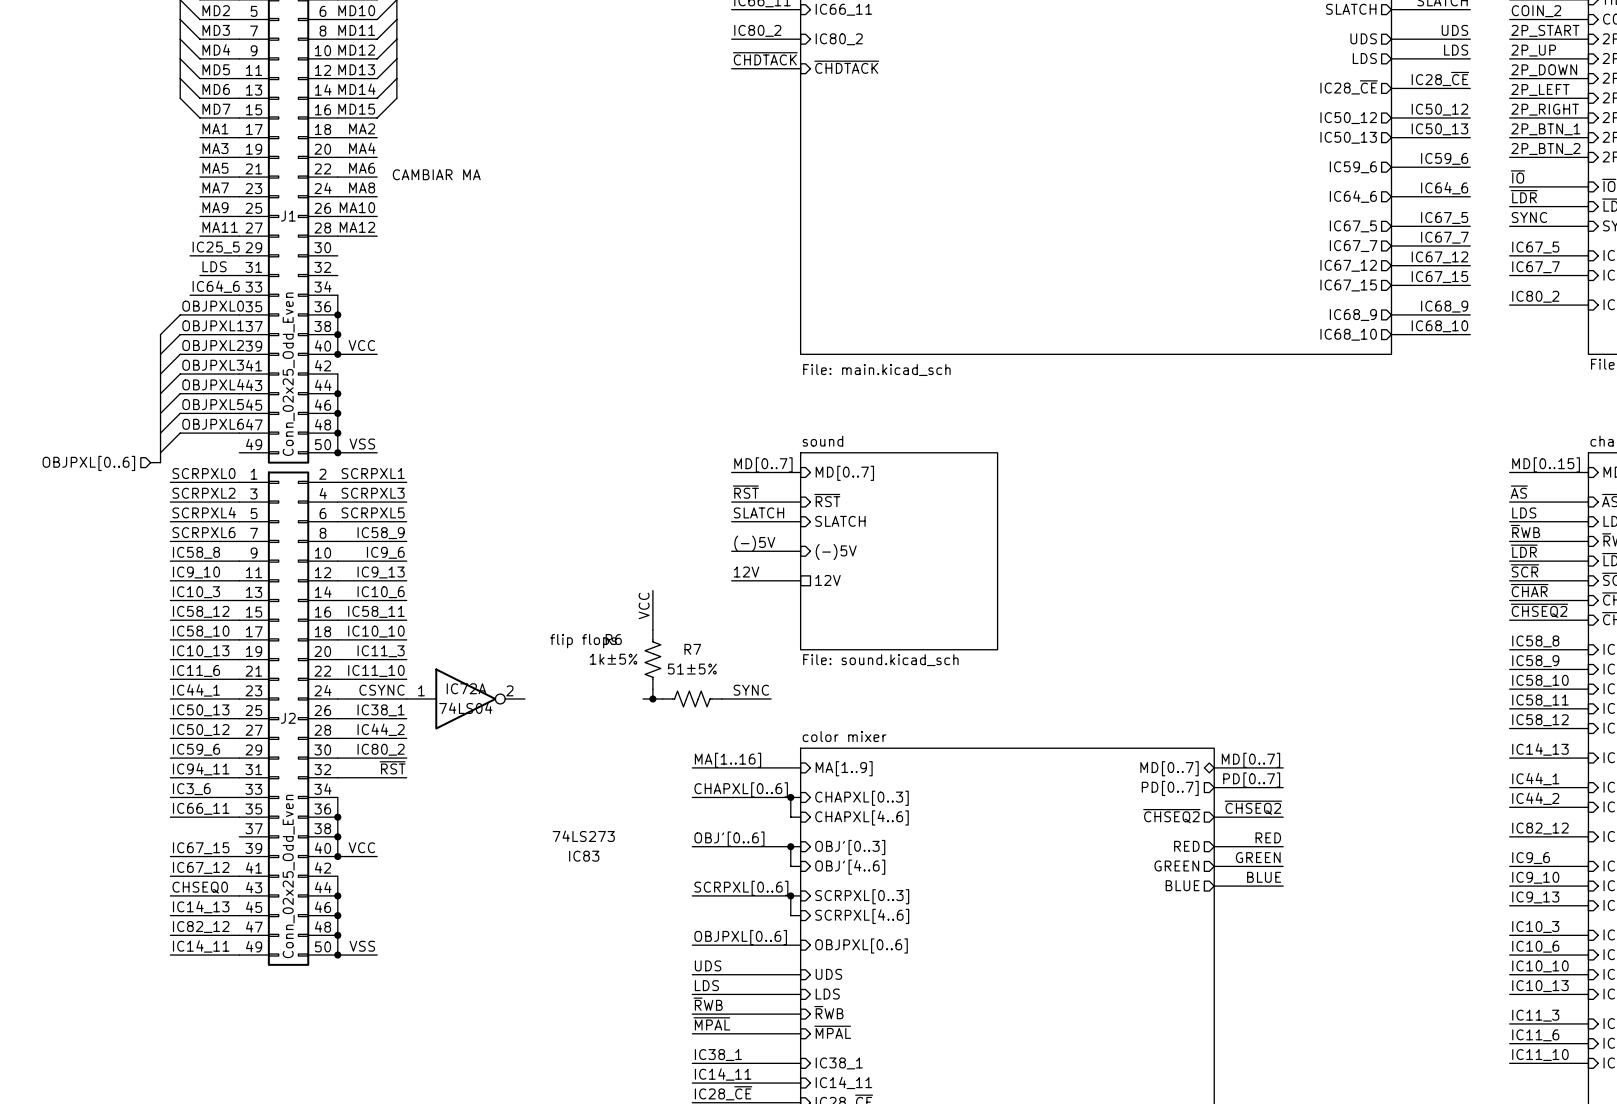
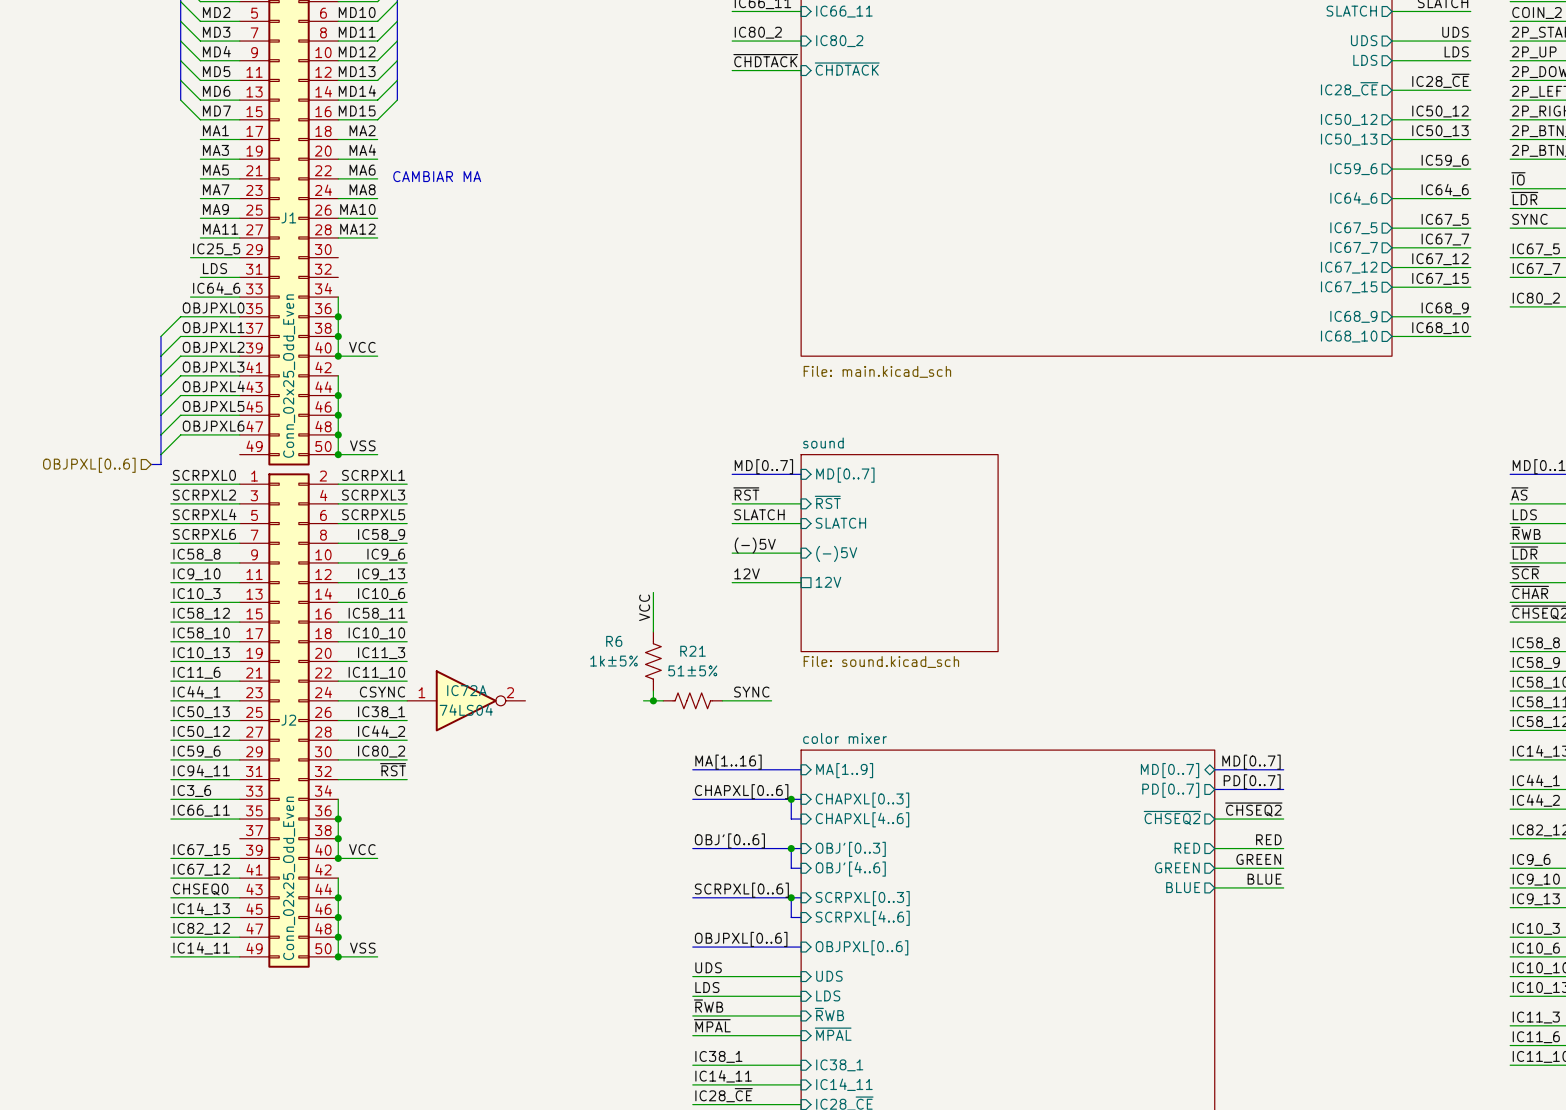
R7 name: R7 (692, 649) -> R21 (693, 651)
IC83: 74LS273 (583, 747) -> none

